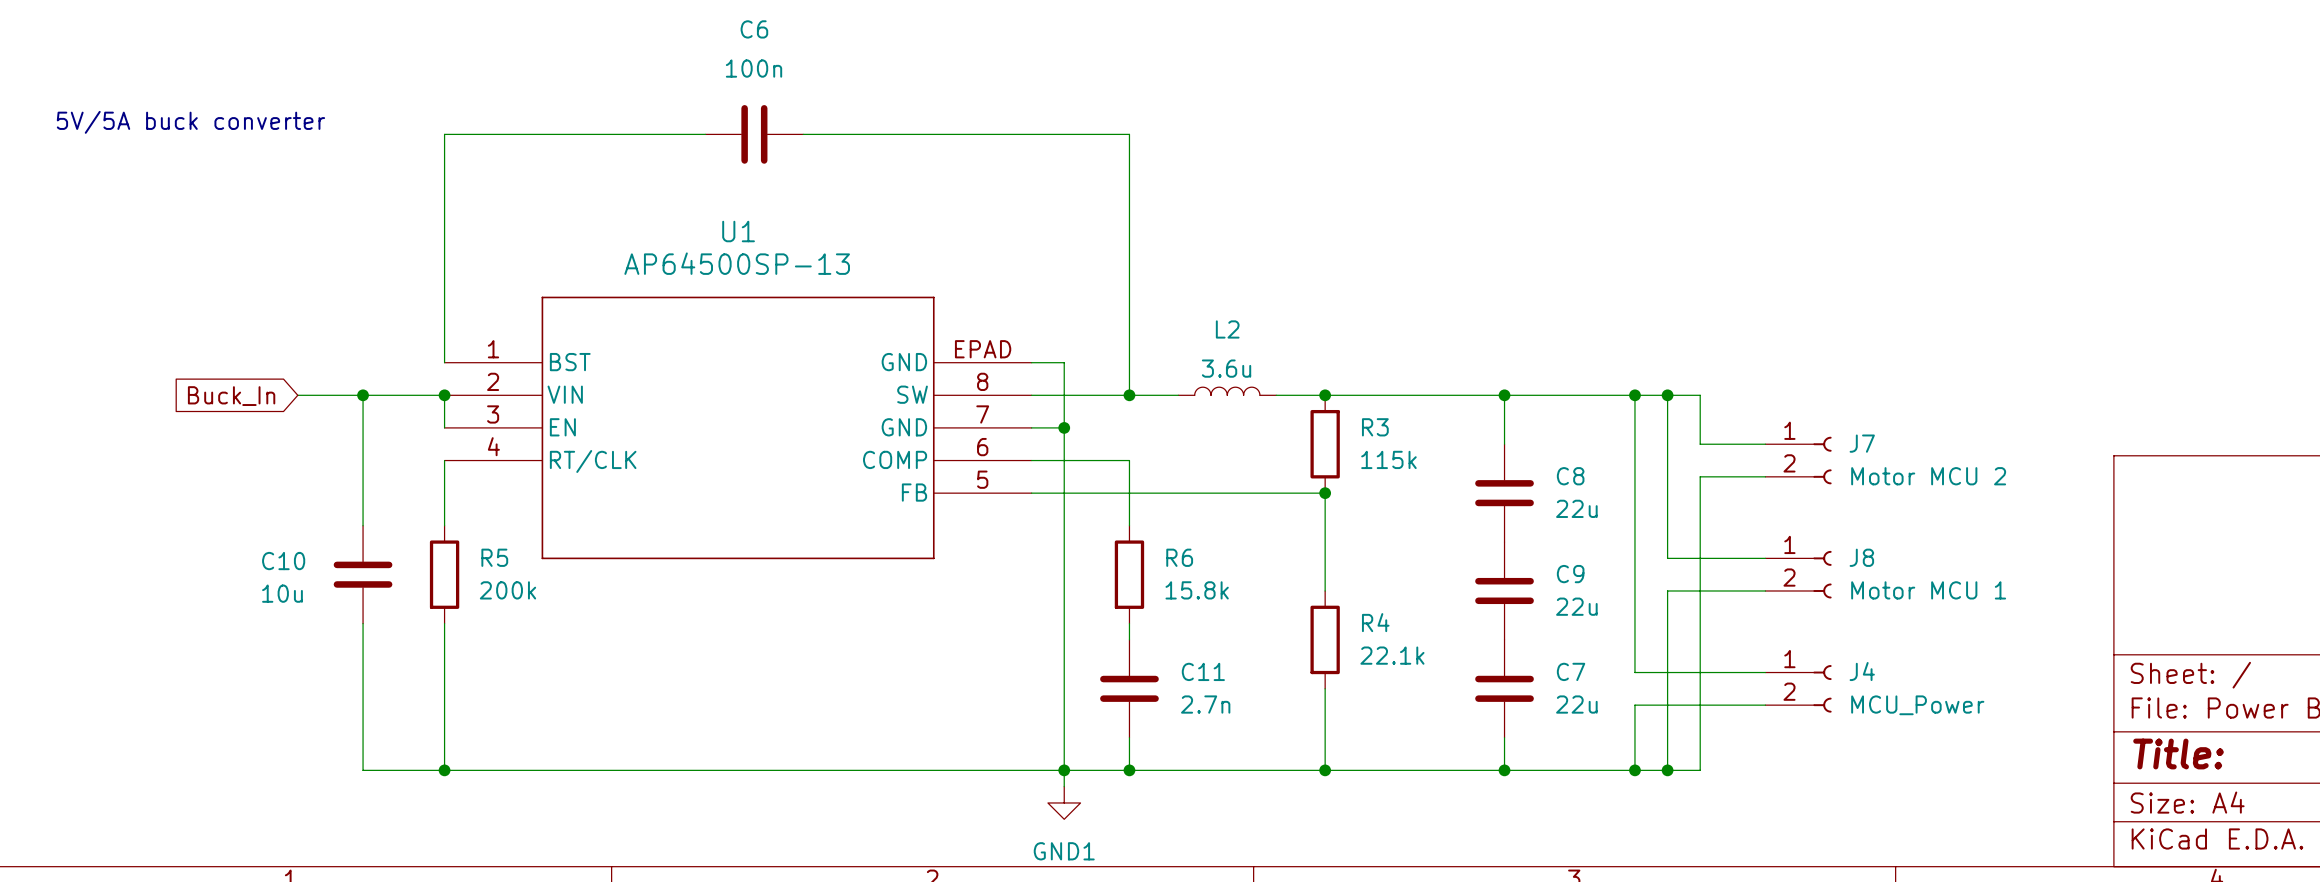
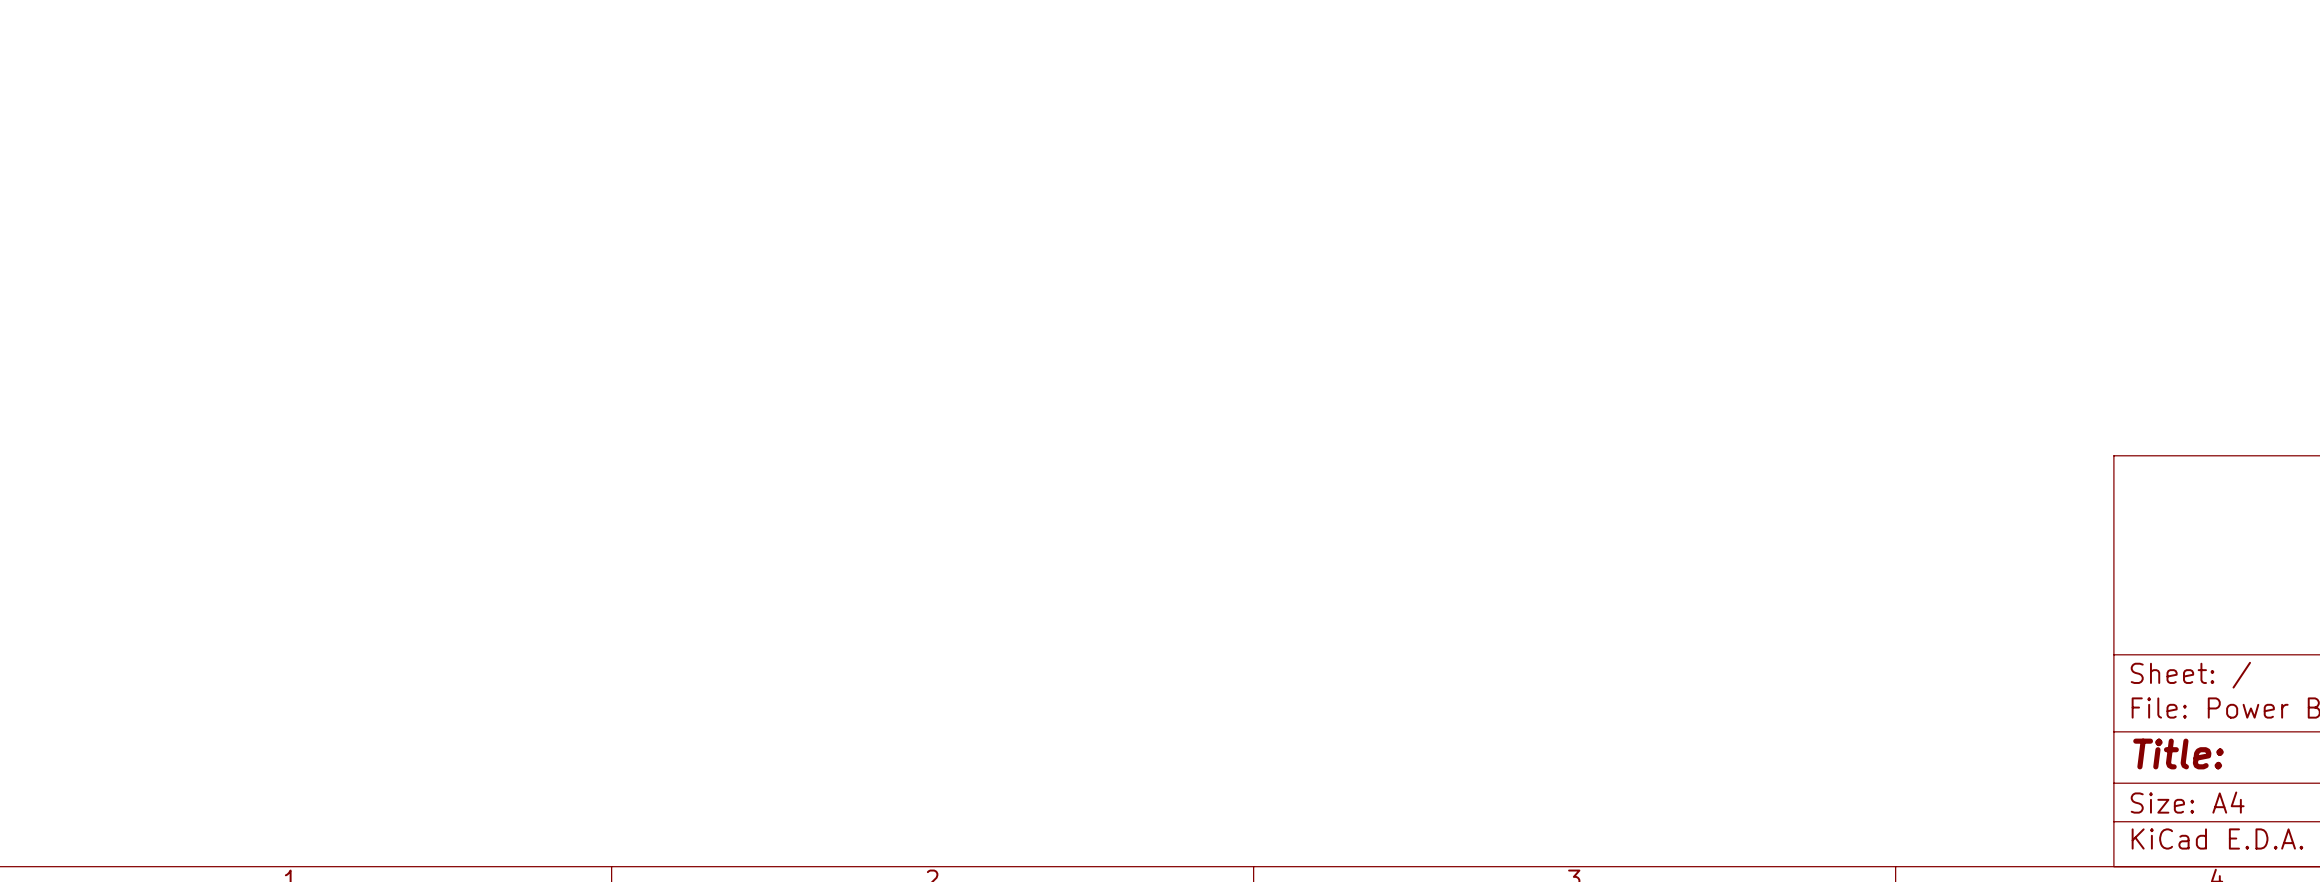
text: 5V/5A buck converter (190, 122) -> none
wire: (705, 134) (444, 134) (444, 362) -> none
C6: 100n (754, 134) -> none
wire: (803, 134) (1129, 134) (1129, 395) -> none
wire: (1031, 362) (1064, 362) (1064, 786) -> none
L2: 3.6u (1227, 391) -> none
wire: (297, 395) (444, 395) (444, 427) -> none
wire: (363, 395) (363, 525) -> none
junction: (363, 395) -> none
junction: (444, 395) -> none
wire: (1031, 395) (1178, 395) -> none
junction: (1129, 395) -> none
wire: (1276, 395) (1700, 395) (1700, 444) (1765, 444) -> none
junction: (1325, 395) -> none
wire: (1504, 395) (1504, 444) -> none
junction: (1504, 395) -> none
wire: (1634, 395) (1634, 672) (1765, 672) -> none
junction: (1634, 395) -> none
wire: (1667, 395) (1667, 558) (1765, 558) -> none
junction: (1667, 395) -> none
global label: Buck_In (231, 396) -> none
U1: AP64500SP-13 (738, 427) -> none
wire: (1031, 427) (1064, 427) -> none
junction: (1064, 427) -> none
R3: 115k (1325, 444) -> none
wire: (444, 460) (444, 525) -> none
wire: (1031, 460) (1129, 460) (1129, 525) -> none
J7: Motor MCU 2 (1798, 460) -> none
wire: (1765, 476) (1700, 476) (1700, 770) (363, 770) (363, 623) -> none
wire: (1031, 493) (1325, 493) (1325, 590) -> none
junction: (1325, 493) -> none
C8: 22u (1504, 493) -> none
C10: 10u (363, 574) -> none
R5: 200k (444, 574) -> none
R6: 15.8k (1129, 574) -> none
J8: Motor MCU 1 (1798, 574) -> none
C9: 22u (1504, 590) -> none
wire: (1765, 590) (1667, 590) (1667, 770) -> none
wire: (444, 623) (444, 770) -> none
wire: (1129, 623) (1129, 639) -> none
R4: 22.1k (1325, 639) -> none
C11: 2.7n (1129, 688) -> none
wire: (1325, 688) (1325, 770) -> none
C7: 22u (1504, 688) -> none
J4: MCU_Power (1798, 688) -> none
wire: (1765, 705) (1634, 705) (1634, 770) -> none
wire: (1129, 737) (1129, 770) -> none
wire: (1504, 737) (1504, 770) -> none
junction: (444, 770) -> none
junction: (1064, 770) -> none
junction: (1129, 770) -> none
junction: (1325, 770) -> none
junction: (1504, 770) -> none
junction: (1634, 770) -> none
junction: (1667, 770) -> none
power symbol: GND1 (1064, 802) -> none

